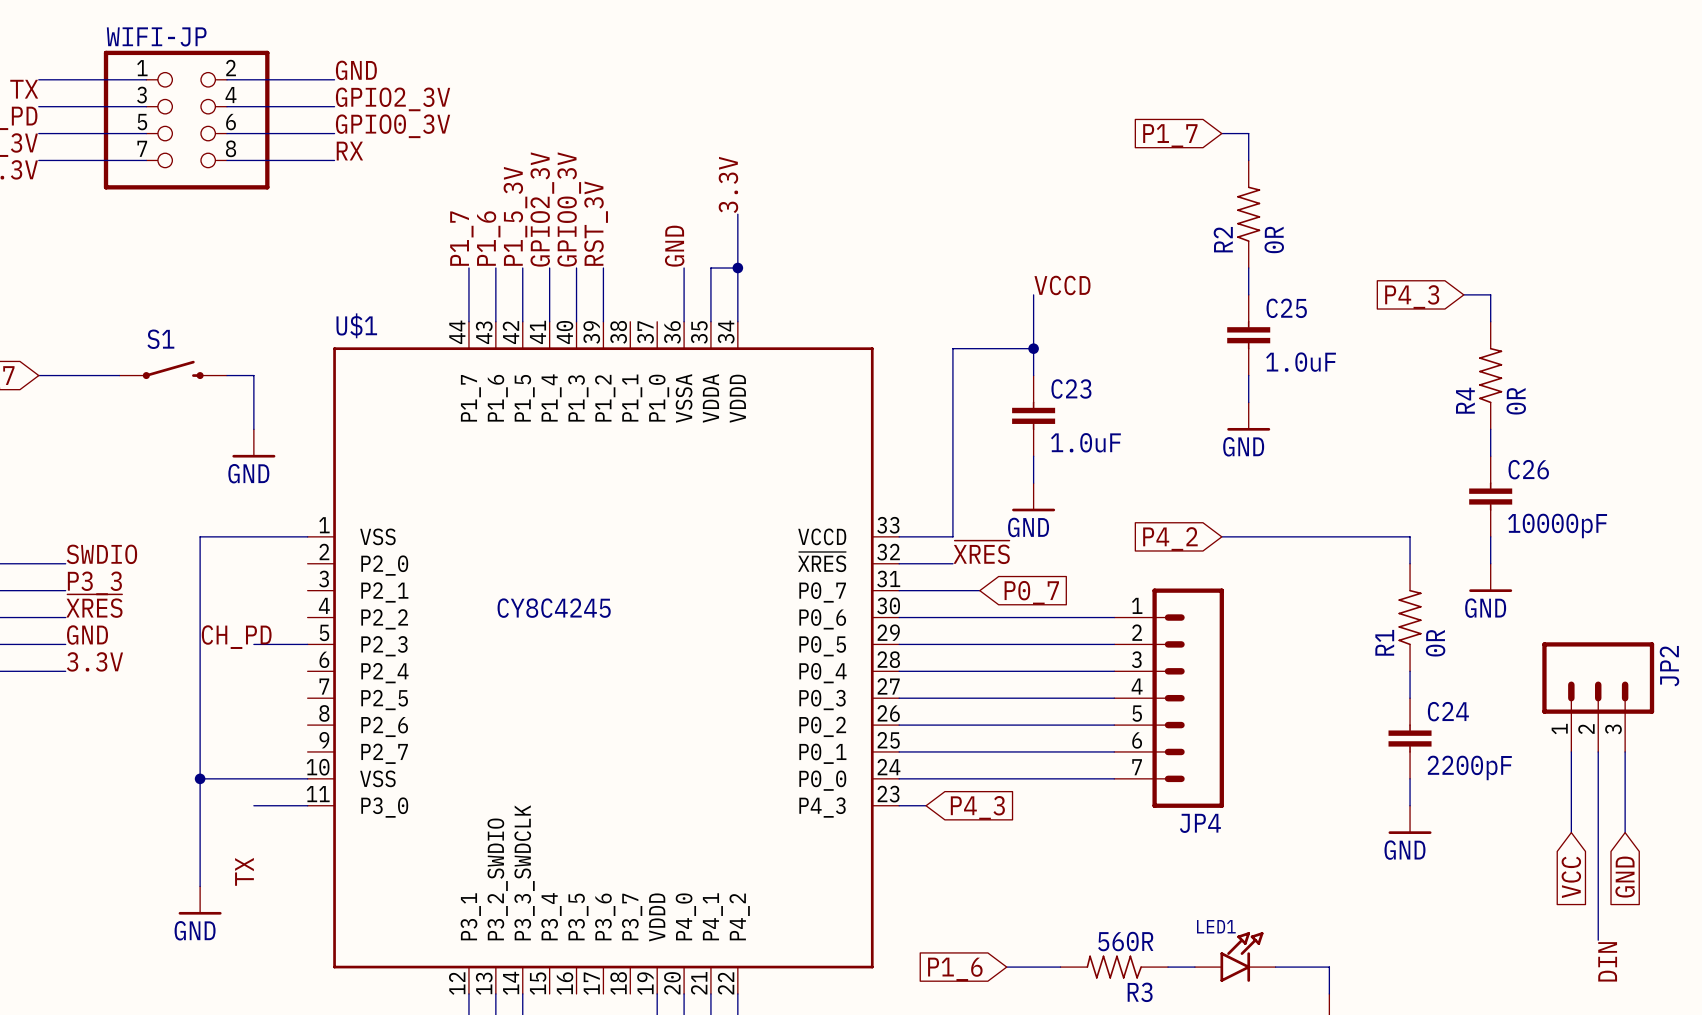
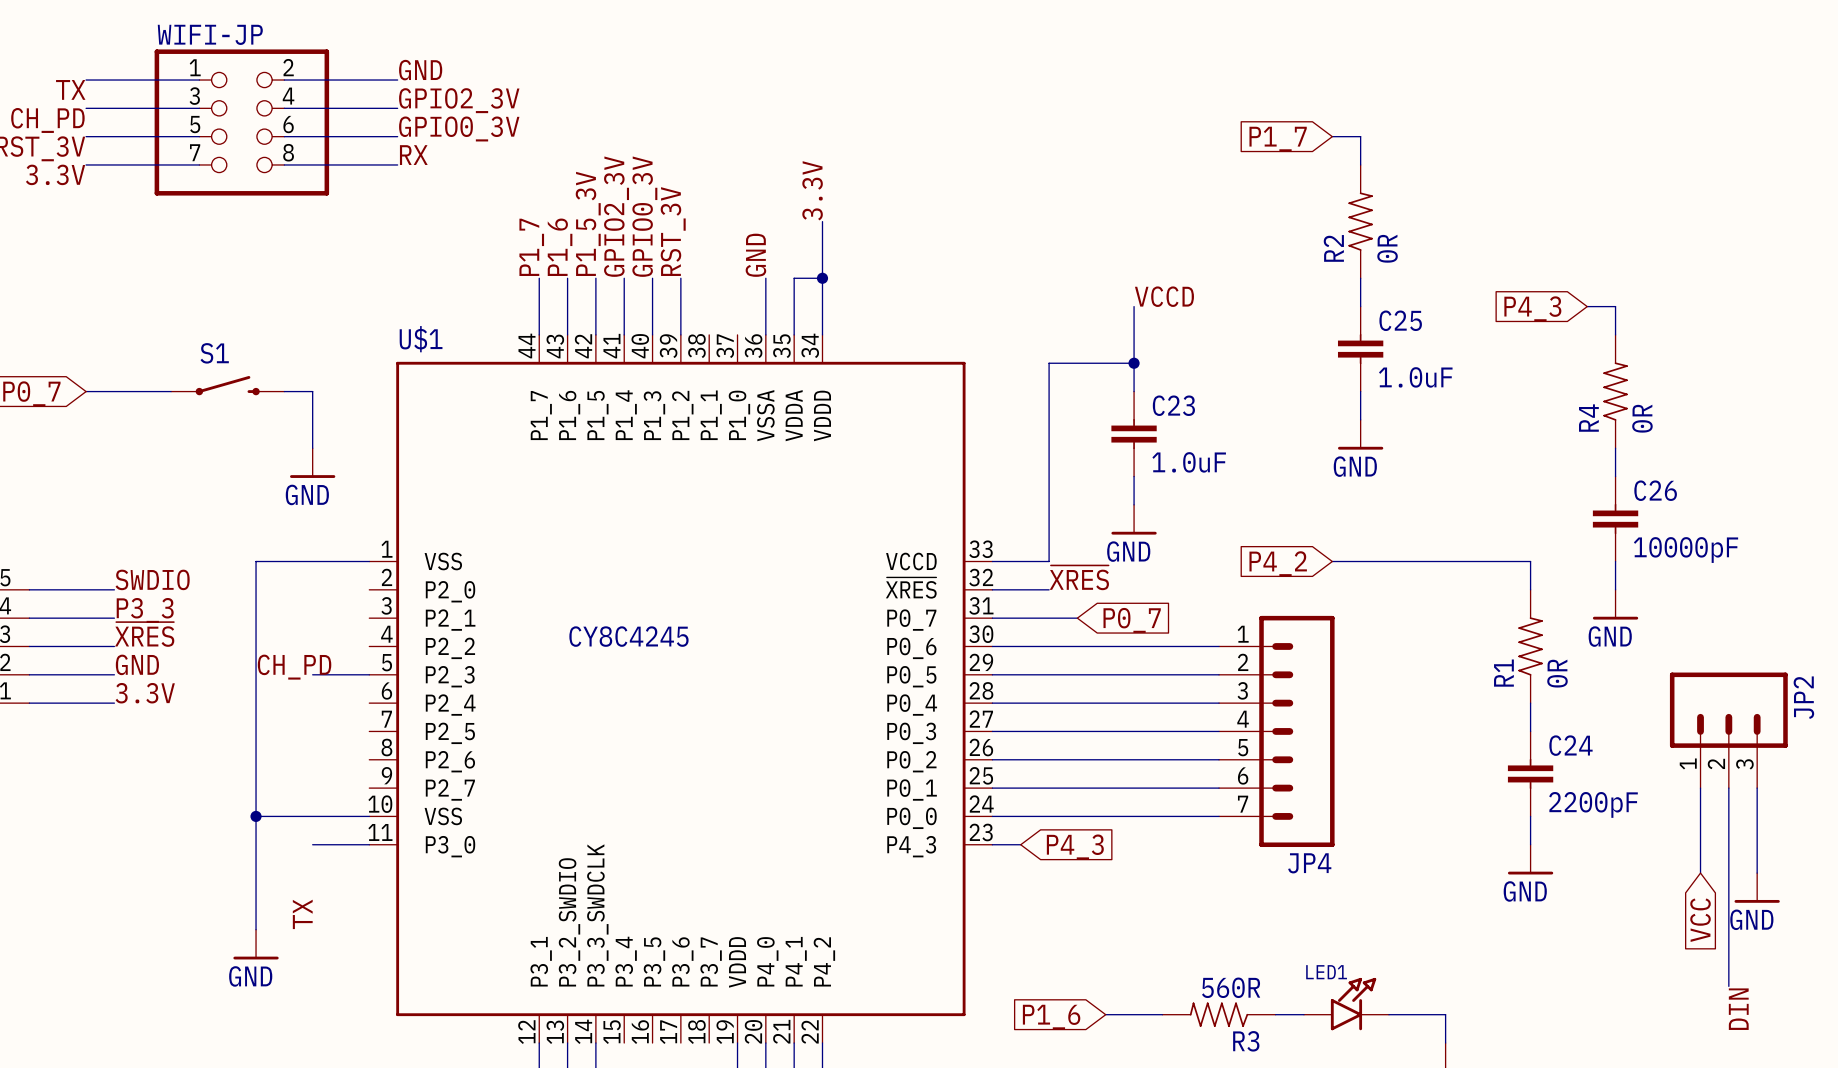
power symbol: none -> GND (1757, 887)
global label: GND (1625, 877) -> none

